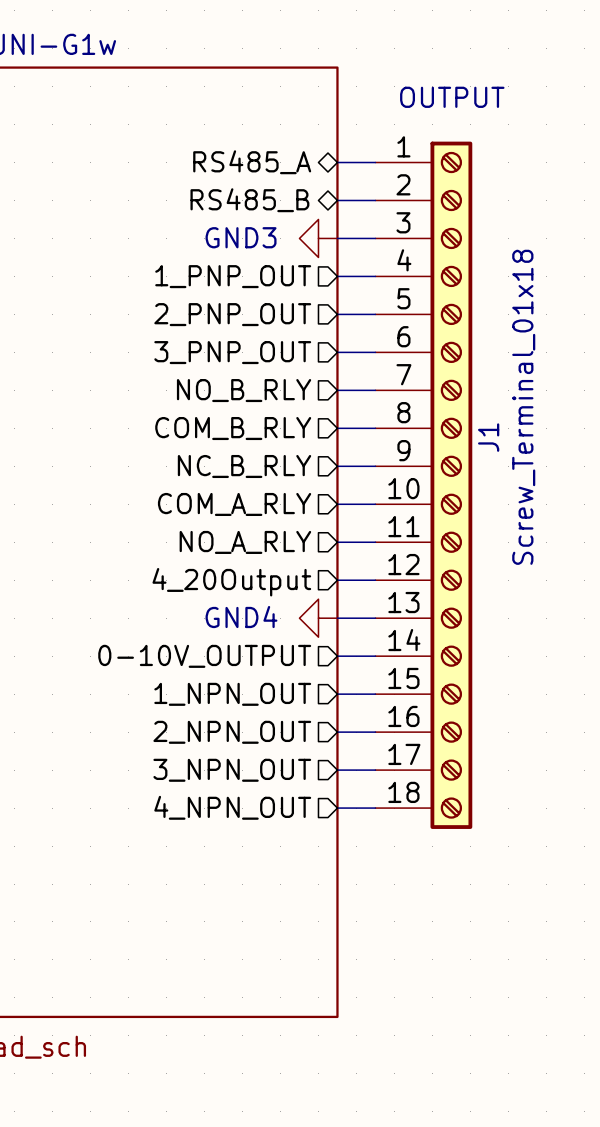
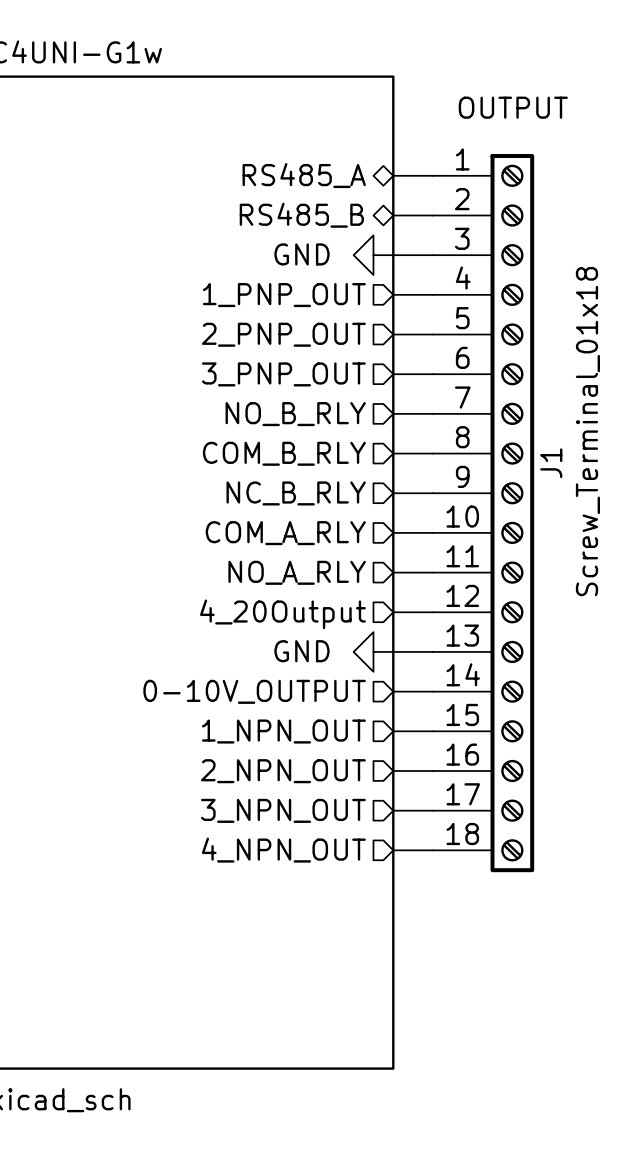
power symbol: GND3 (318, 238) -> GND (373, 255)
power symbol: GND4 (318, 618) -> GND (373, 651)

